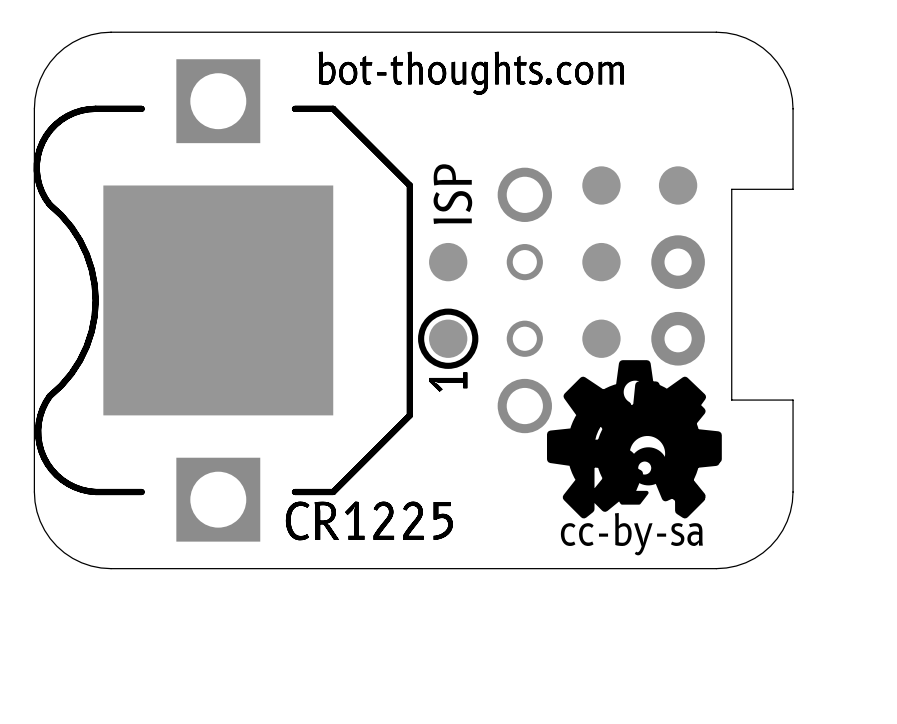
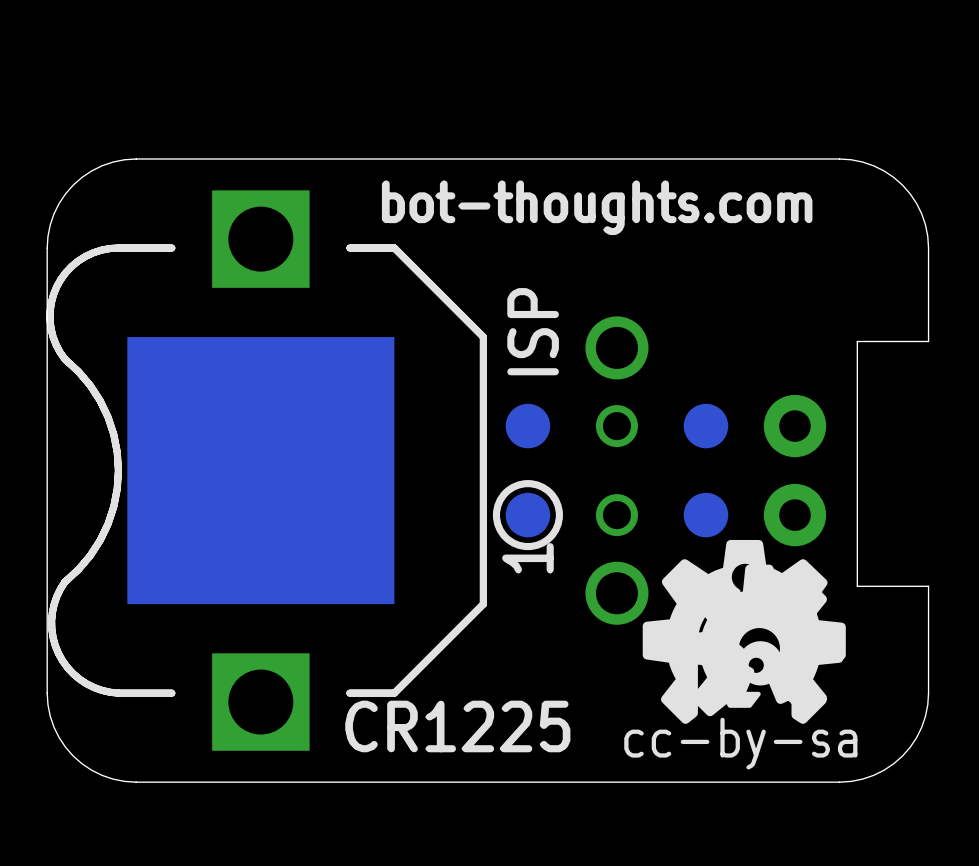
part: (601, 185) -> none
part: (678, 185) -> none

